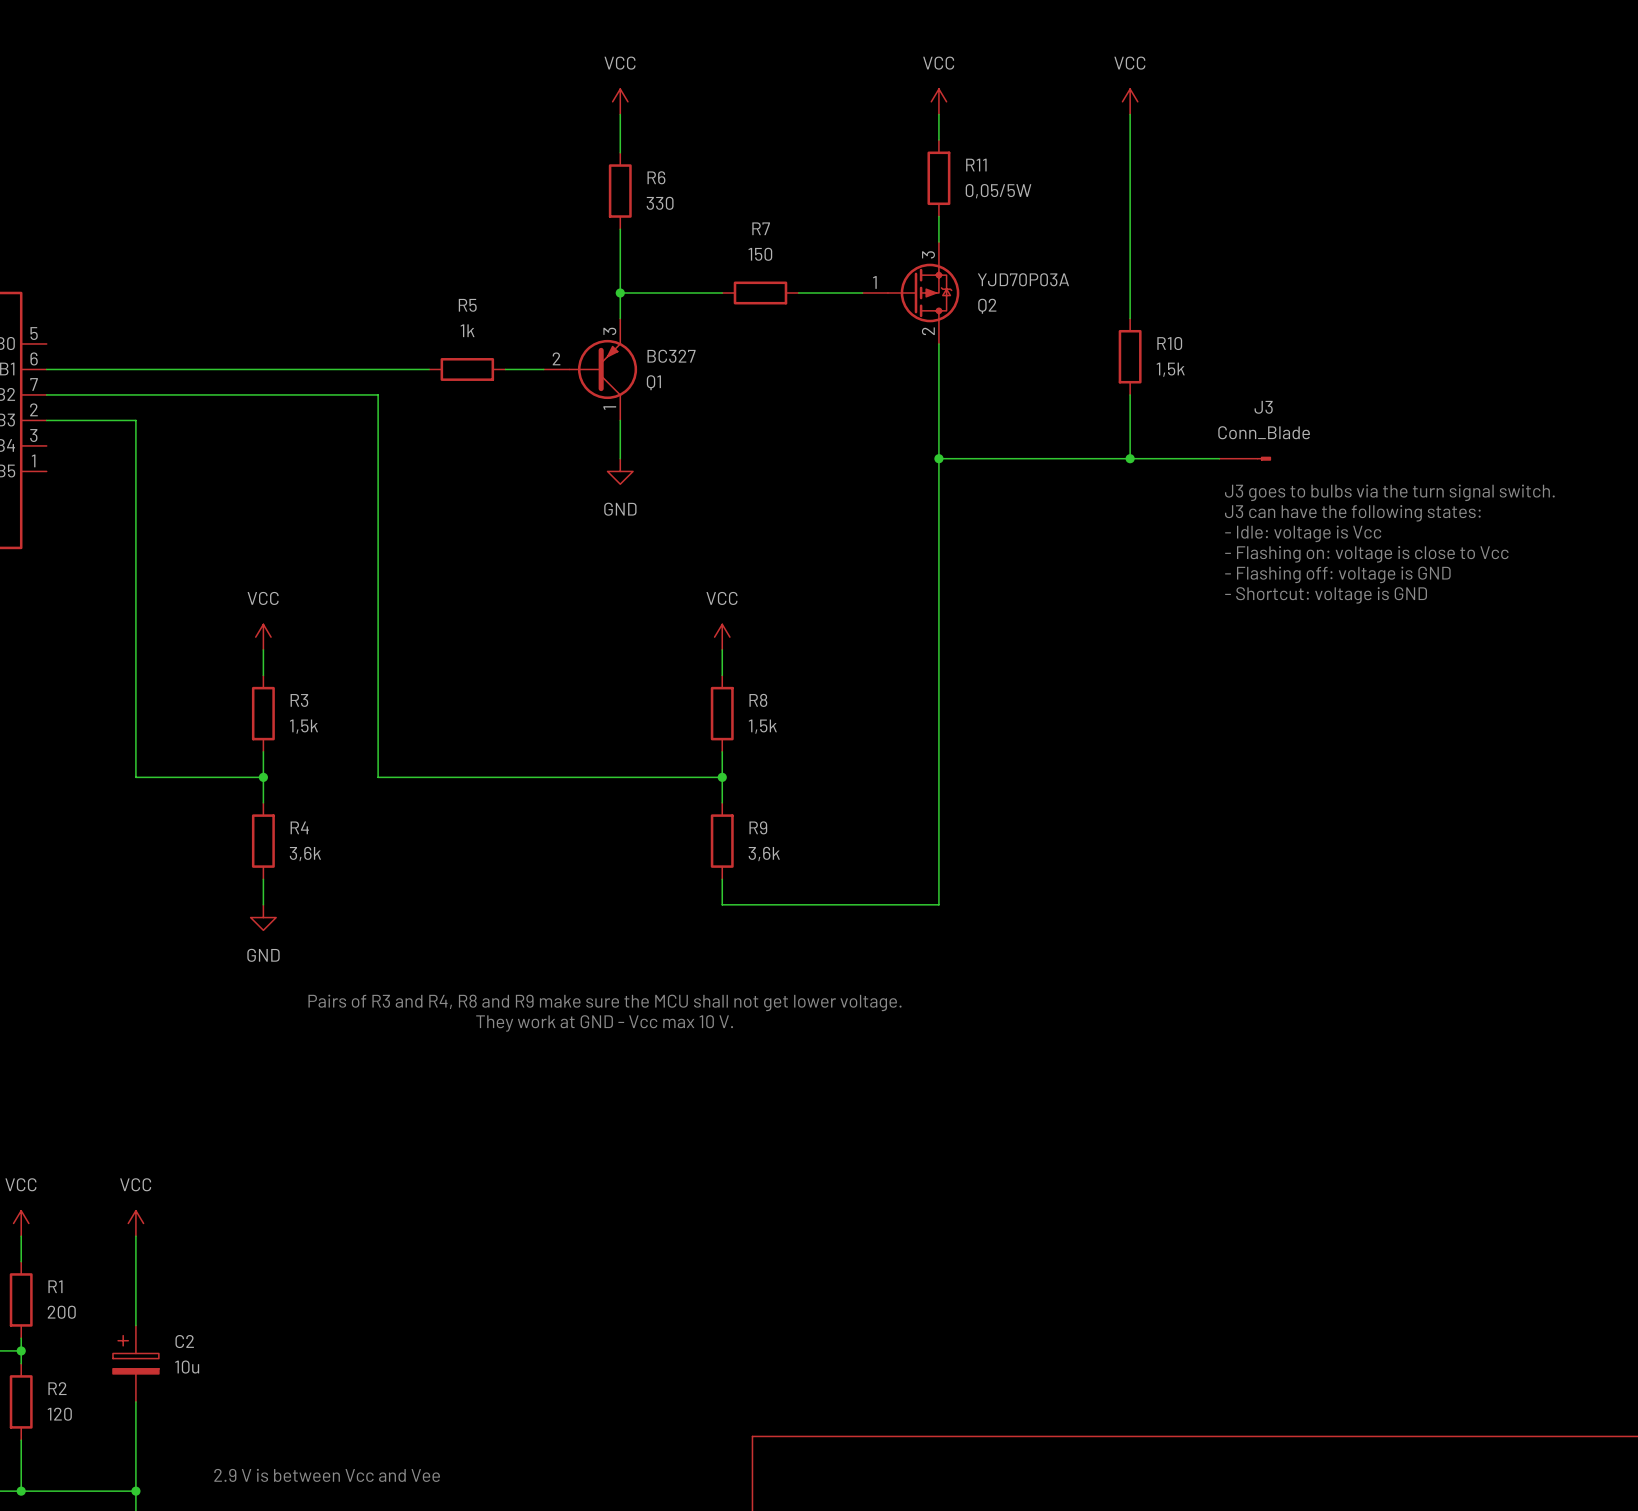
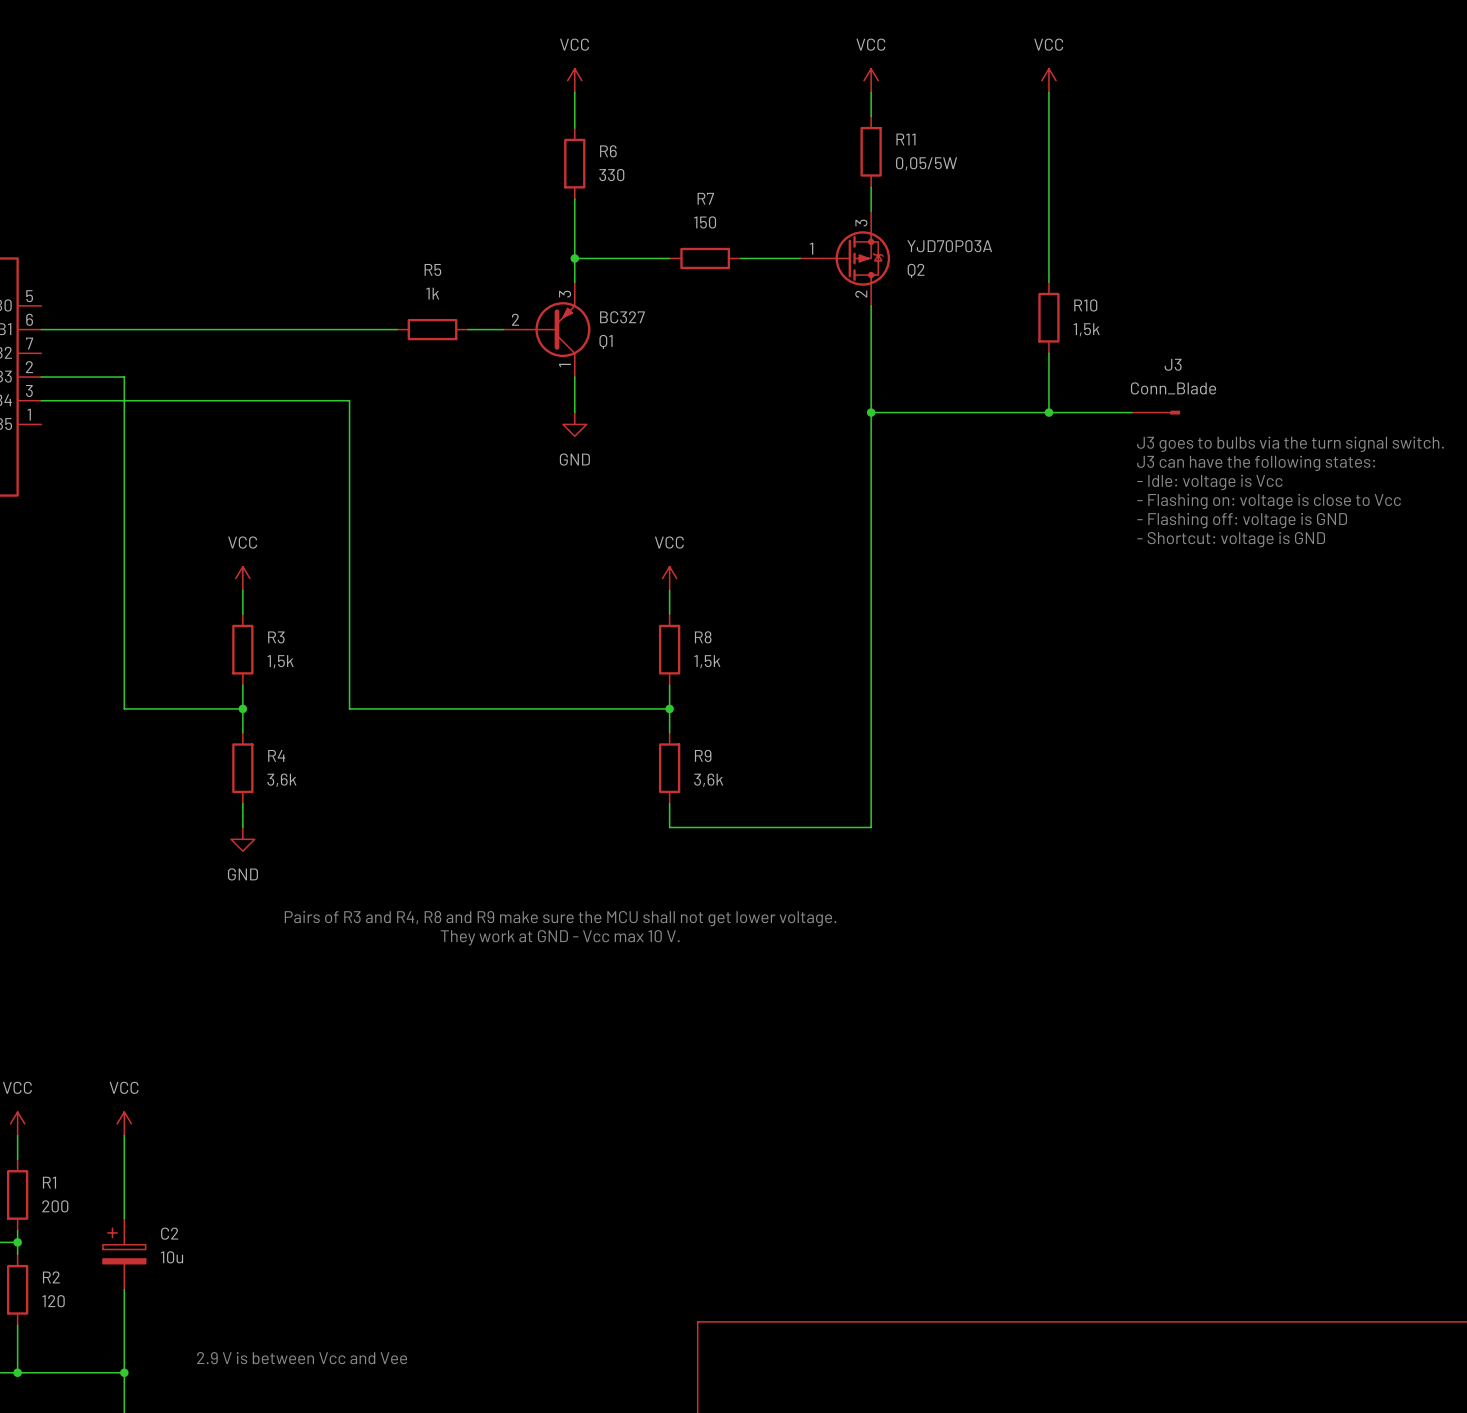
wire: (46, 394) (378, 394) (378, 445) -> (41, 400) (349, 400)

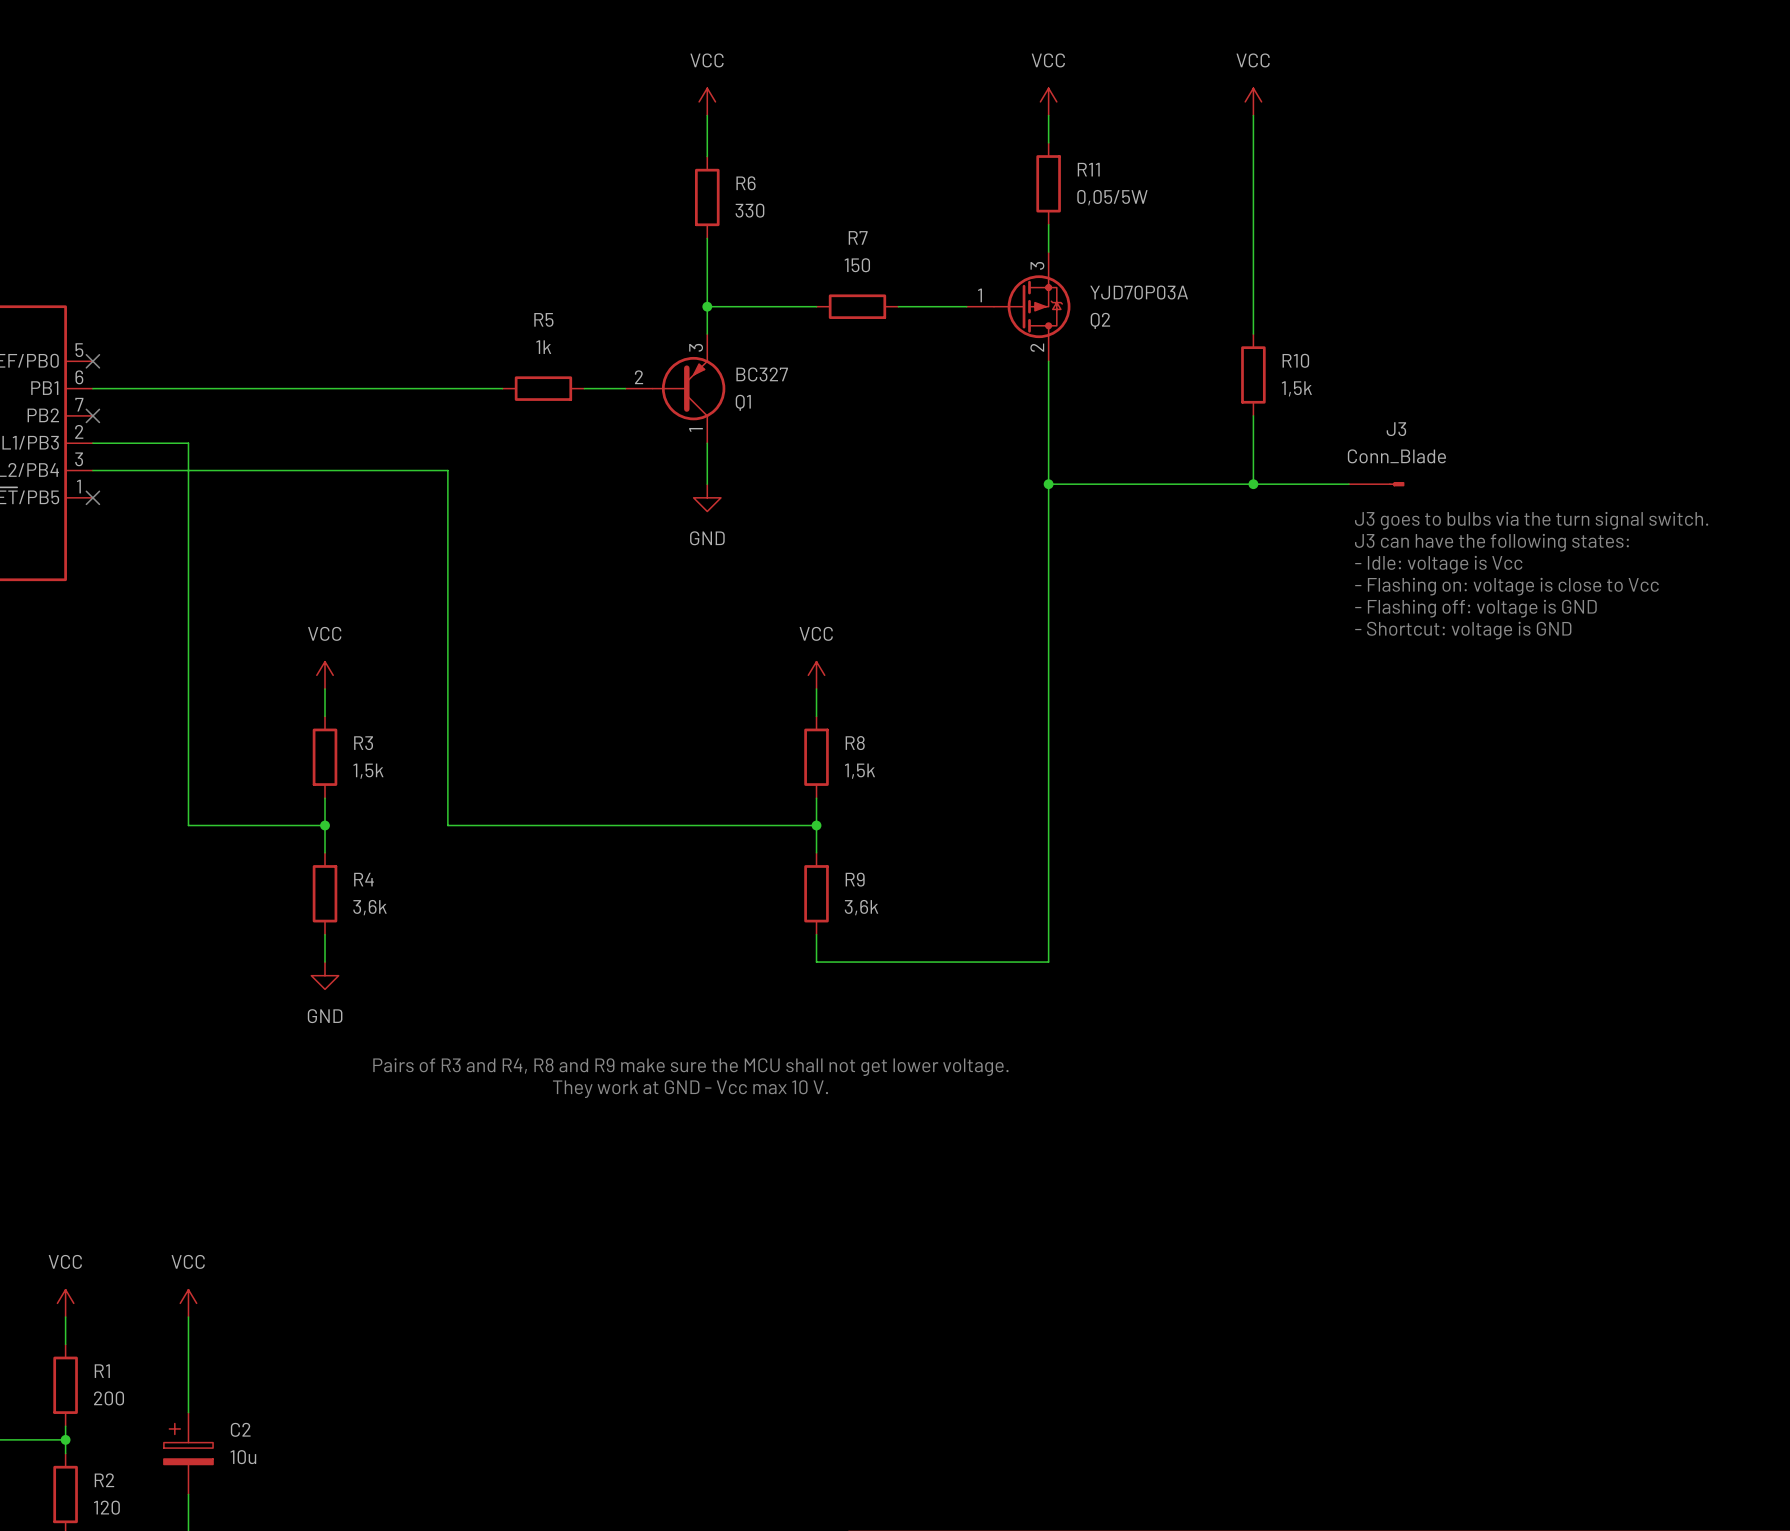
no-connect mark: none -> (92, 361)
no-connect mark: none -> (92, 415)
no-connect mark: none -> (92, 497)

